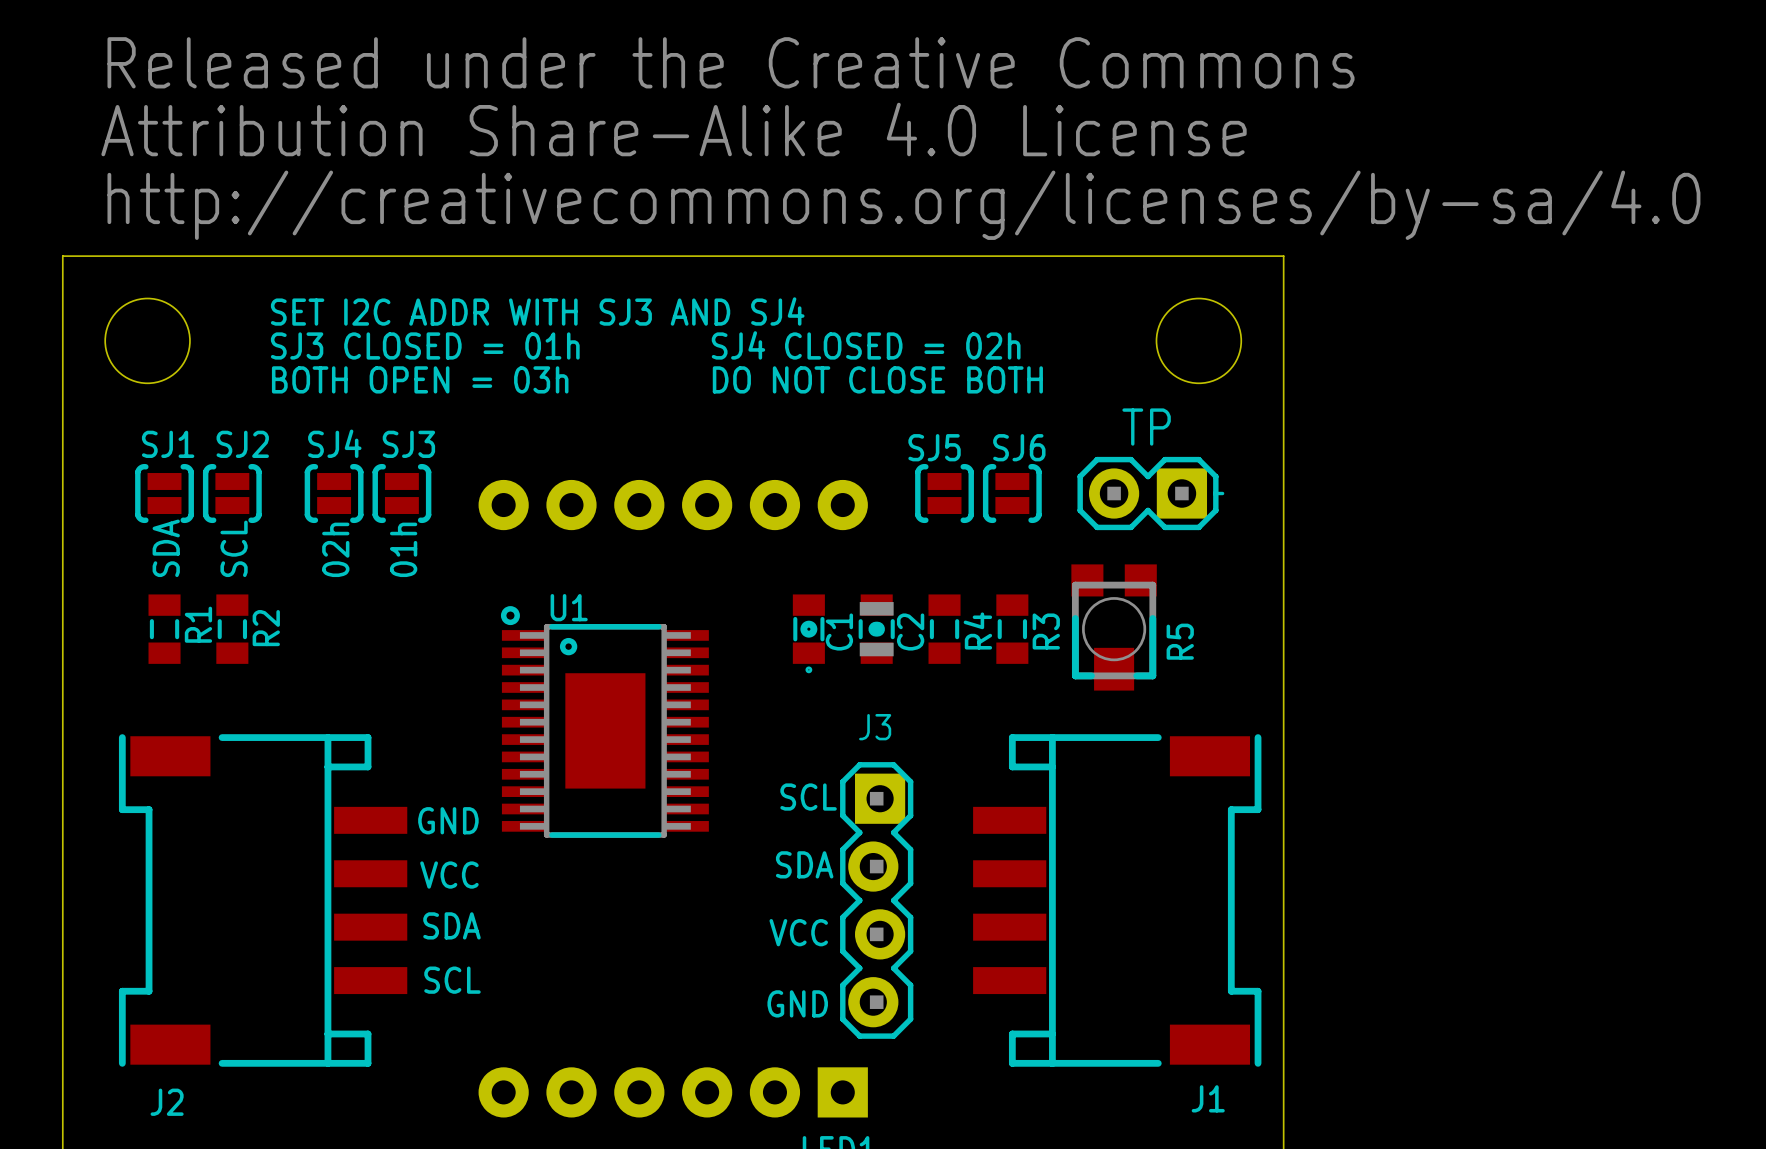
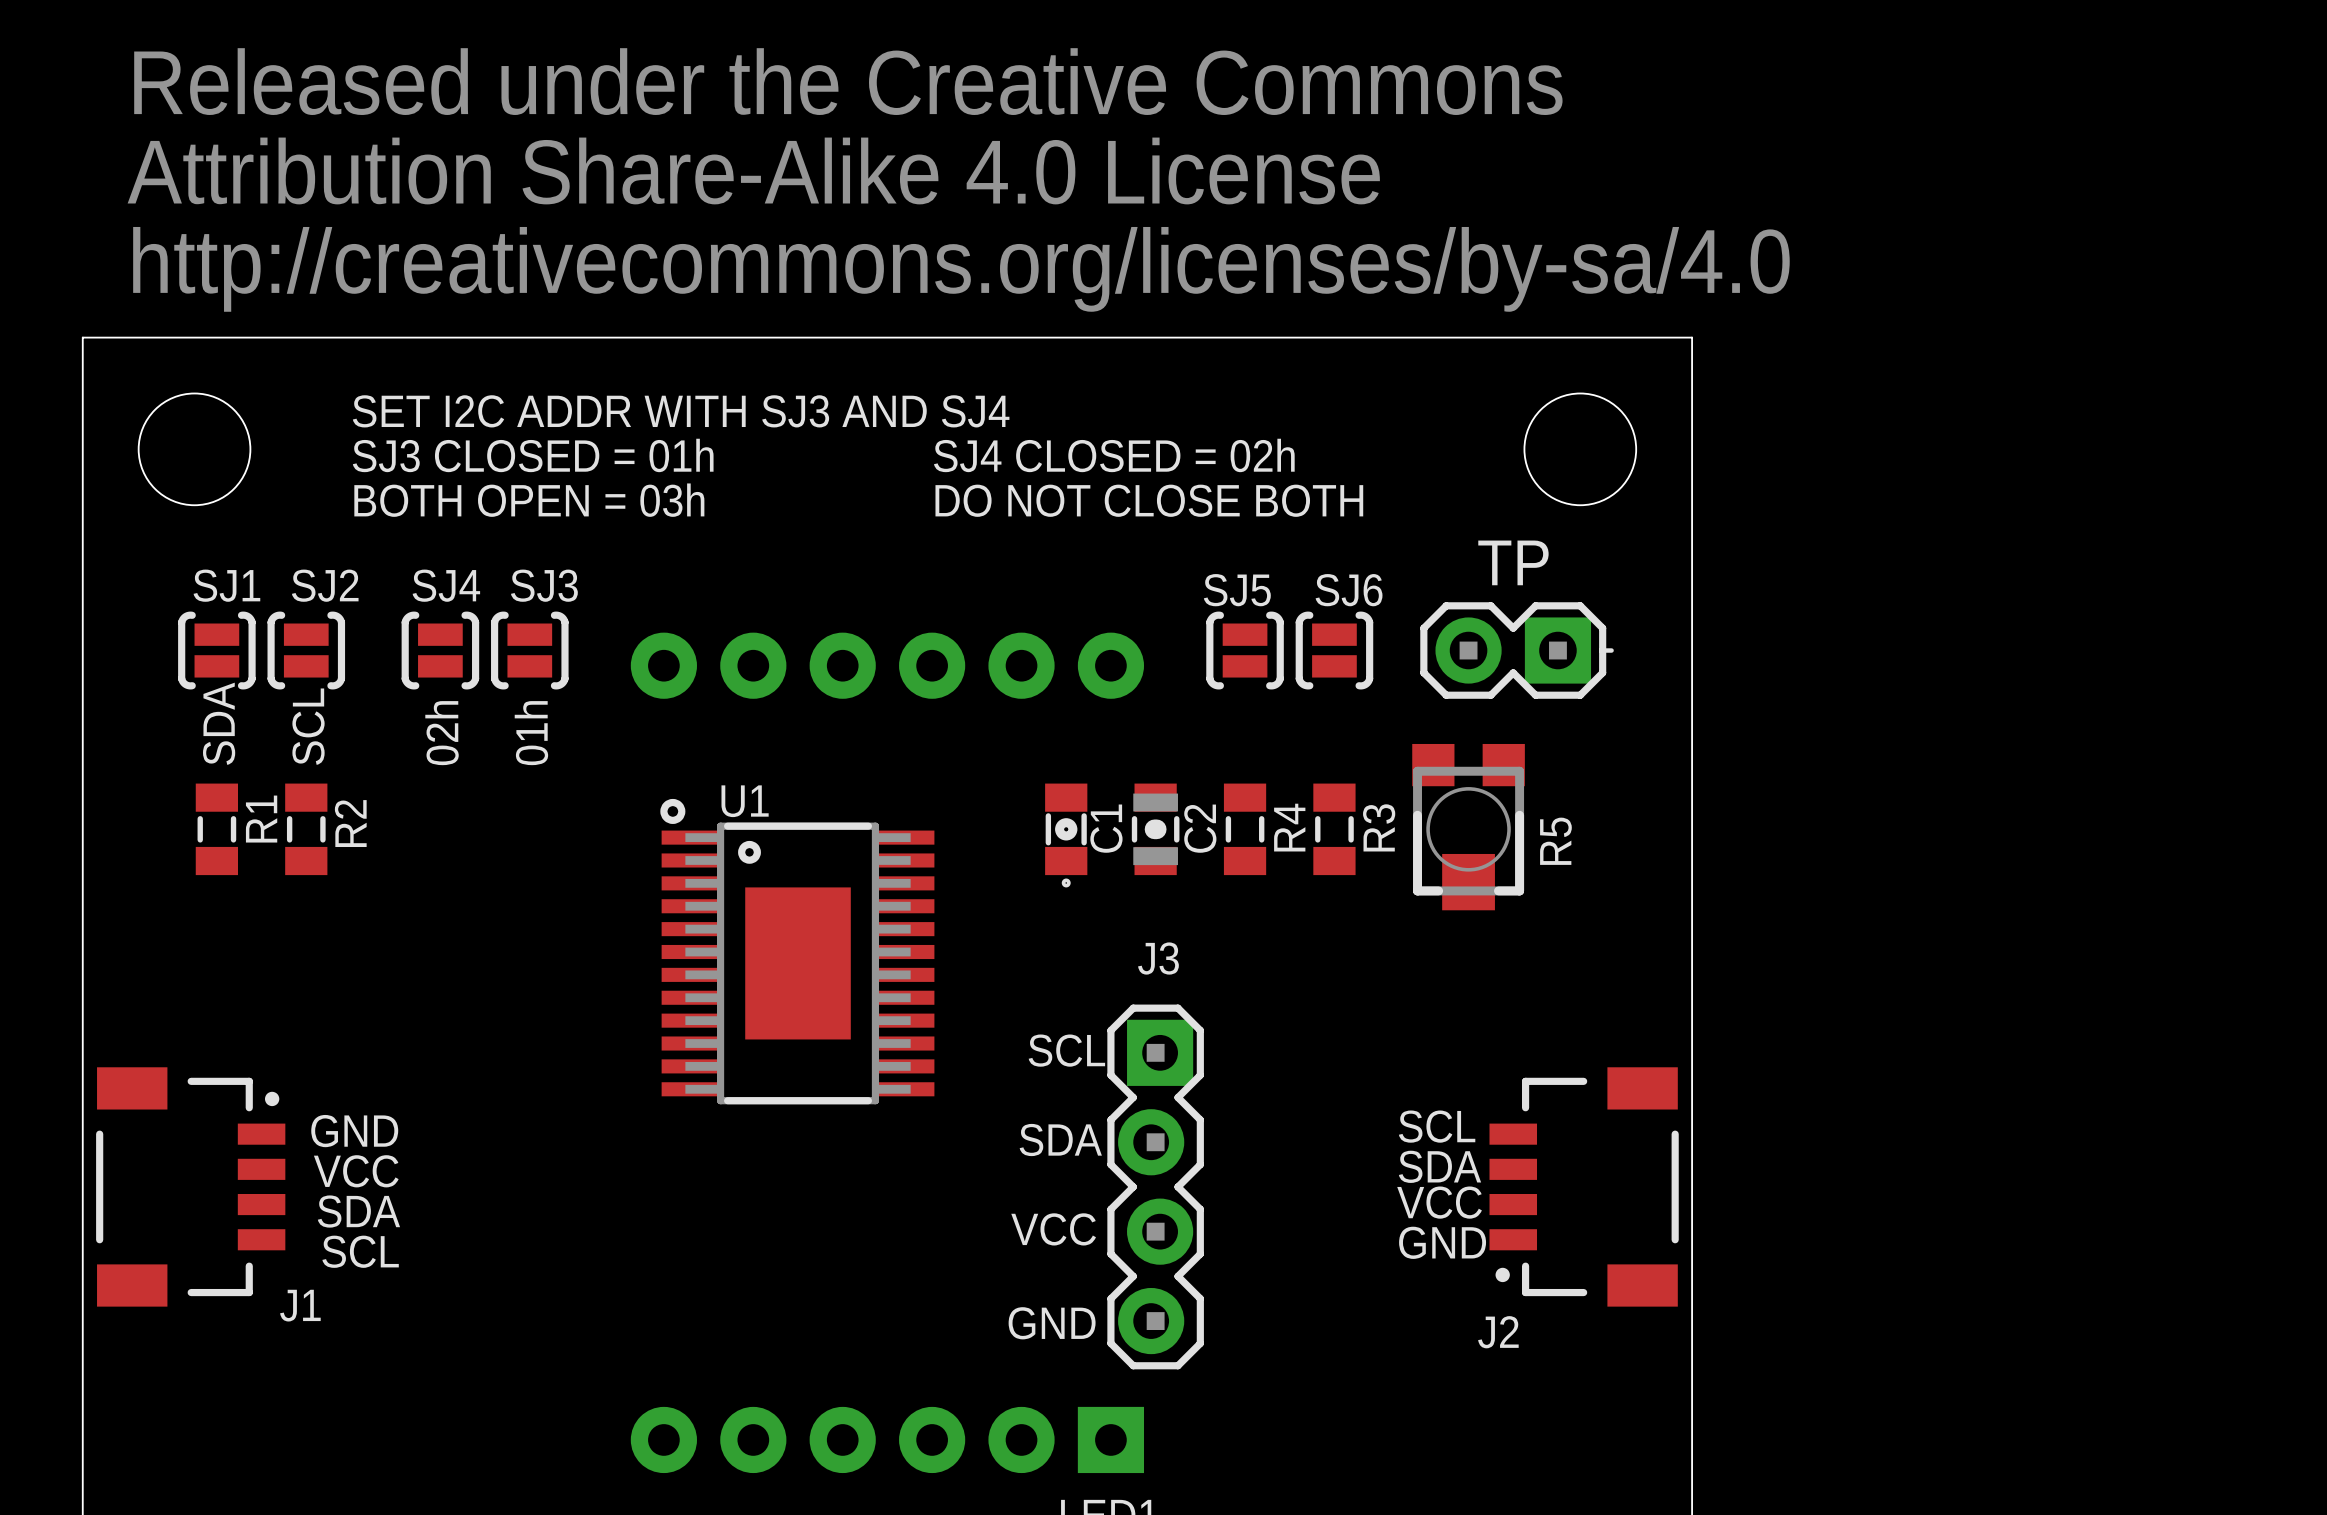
J2 footprint: [118, 734, 408, 1067] -> [1489, 1067, 1679, 1307]
J1 footprint: [973, 734, 1262, 1067] -> [96, 1067, 286, 1307]
text position: GND (448, 820) -> GND (354, 1131)
text: none -> SCL (1437, 1126)
text position: VCC (449, 875) -> VCC (356, 1171)
text: none -> SDA (1440, 1166)
text: none -> VCC (1439, 1202)
text position: SDA (451, 925) -> SDA (358, 1211)
text: none -> GND (1442, 1242)
text position: SCL (452, 980) -> SCL (360, 1251)
J1 name position: J1 (1208, 1098) -> J1 (300, 1305)
J2 name position: J2 (167, 1102) -> J2 (1498, 1332)

